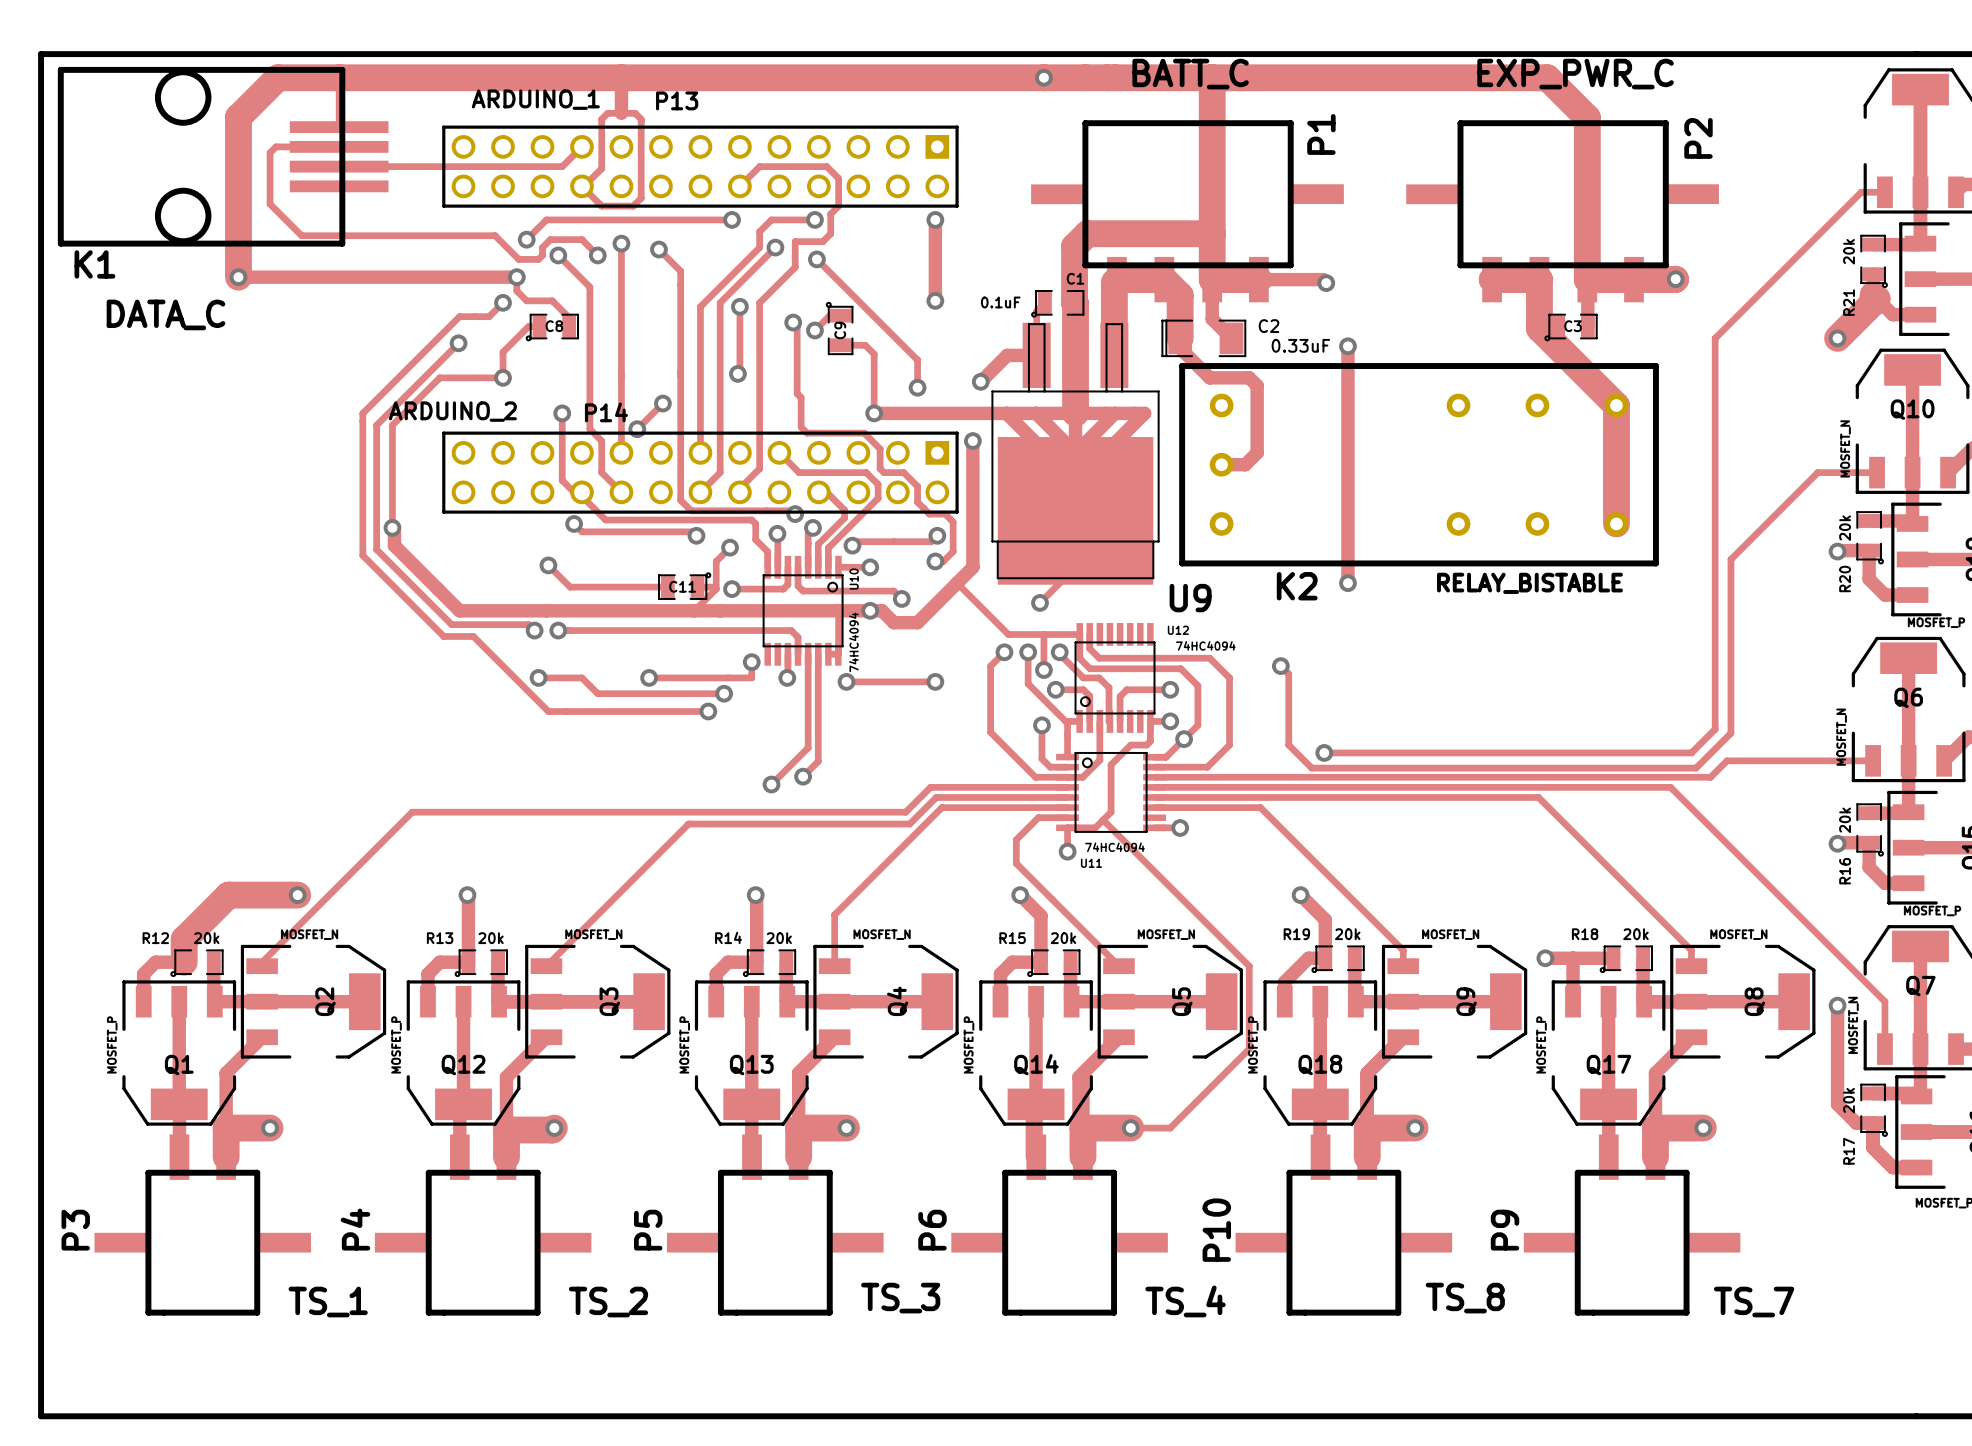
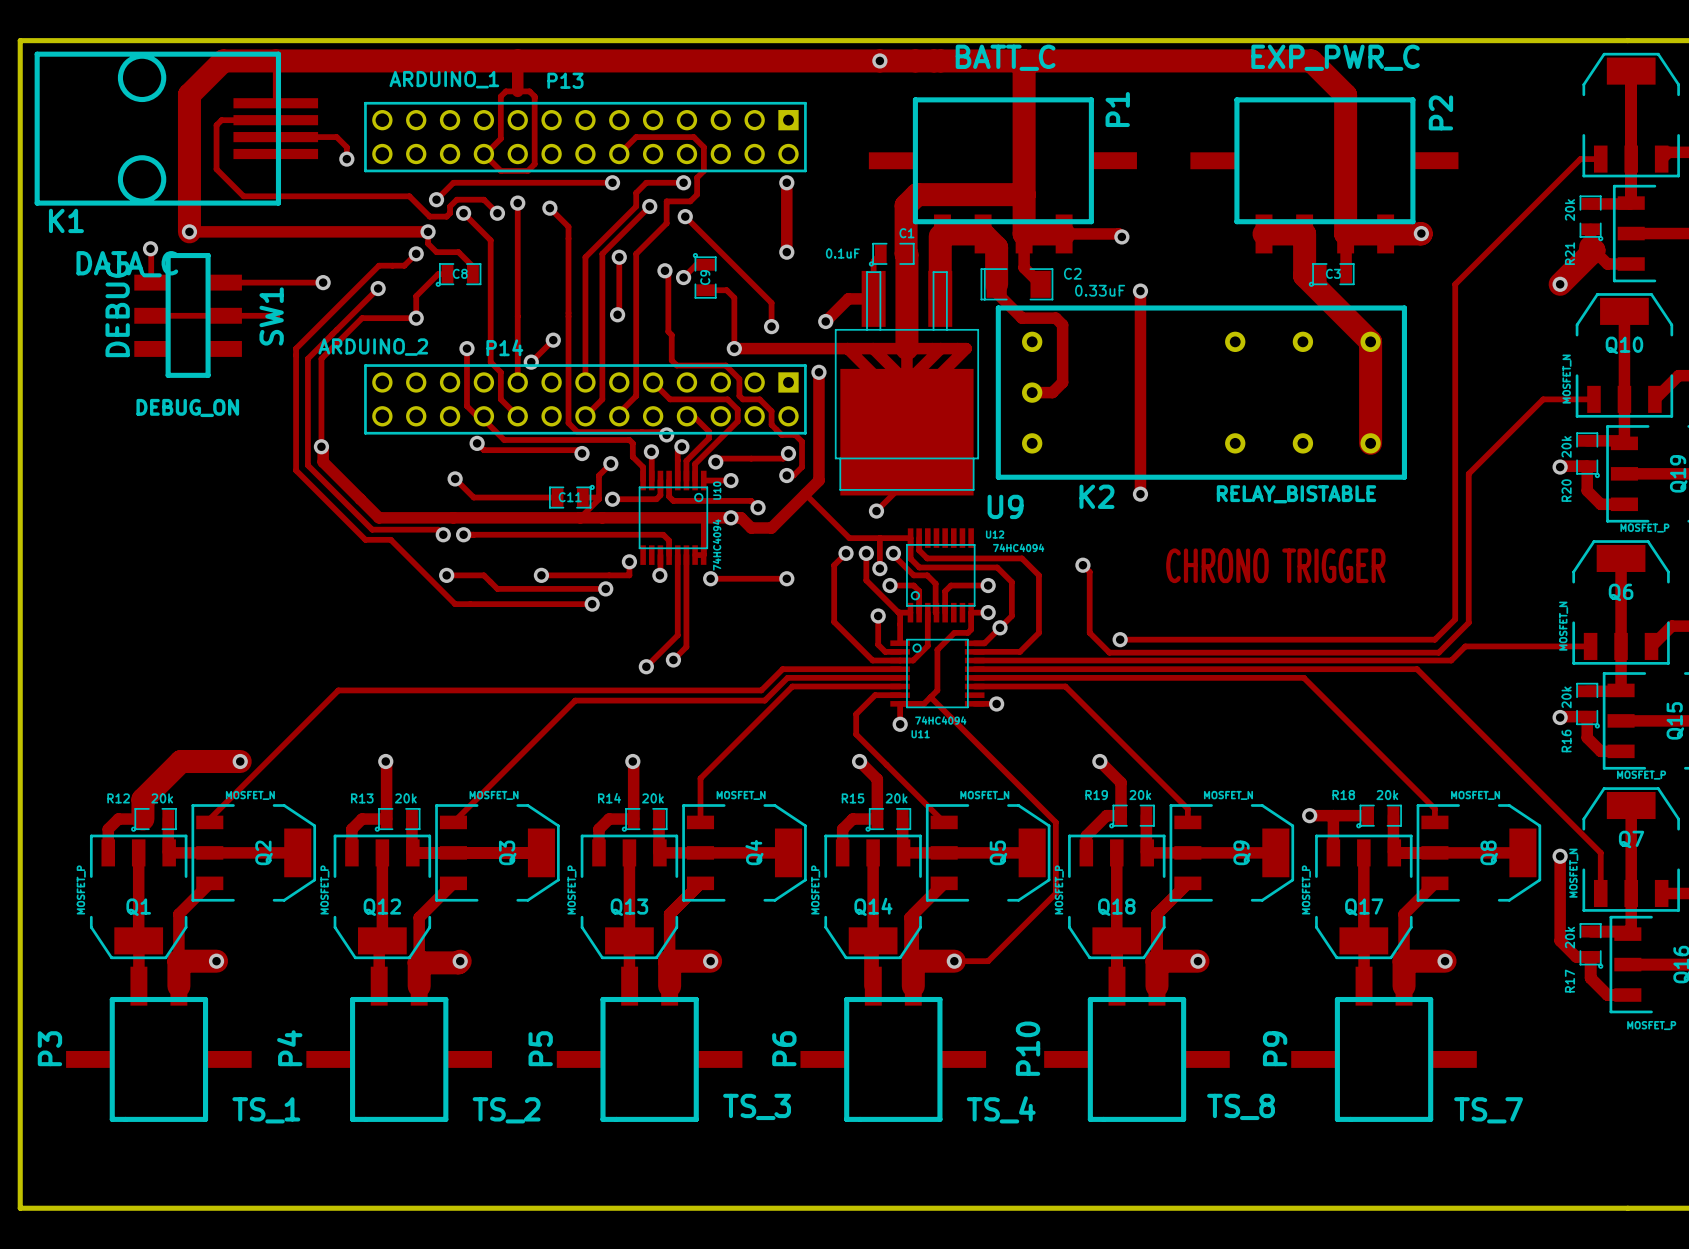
track: (581, 146) (562, 166) (410, 166) -> (346, 159) (346, 147) (336, 137)
via: none -> (346, 159)
track: none -> (150, 248) (151, 282)
via: none -> (150, 248)
track: none -> (225, 282) (323, 282)
via: none -> (323, 282)
SW1: none -> DEBUG (188, 315)
track: none -> (151, 315) (277, 316)
text: none -> DEBUG_ON (187, 407)
text: none -> CHRONO TRIGGER (1275, 565)

